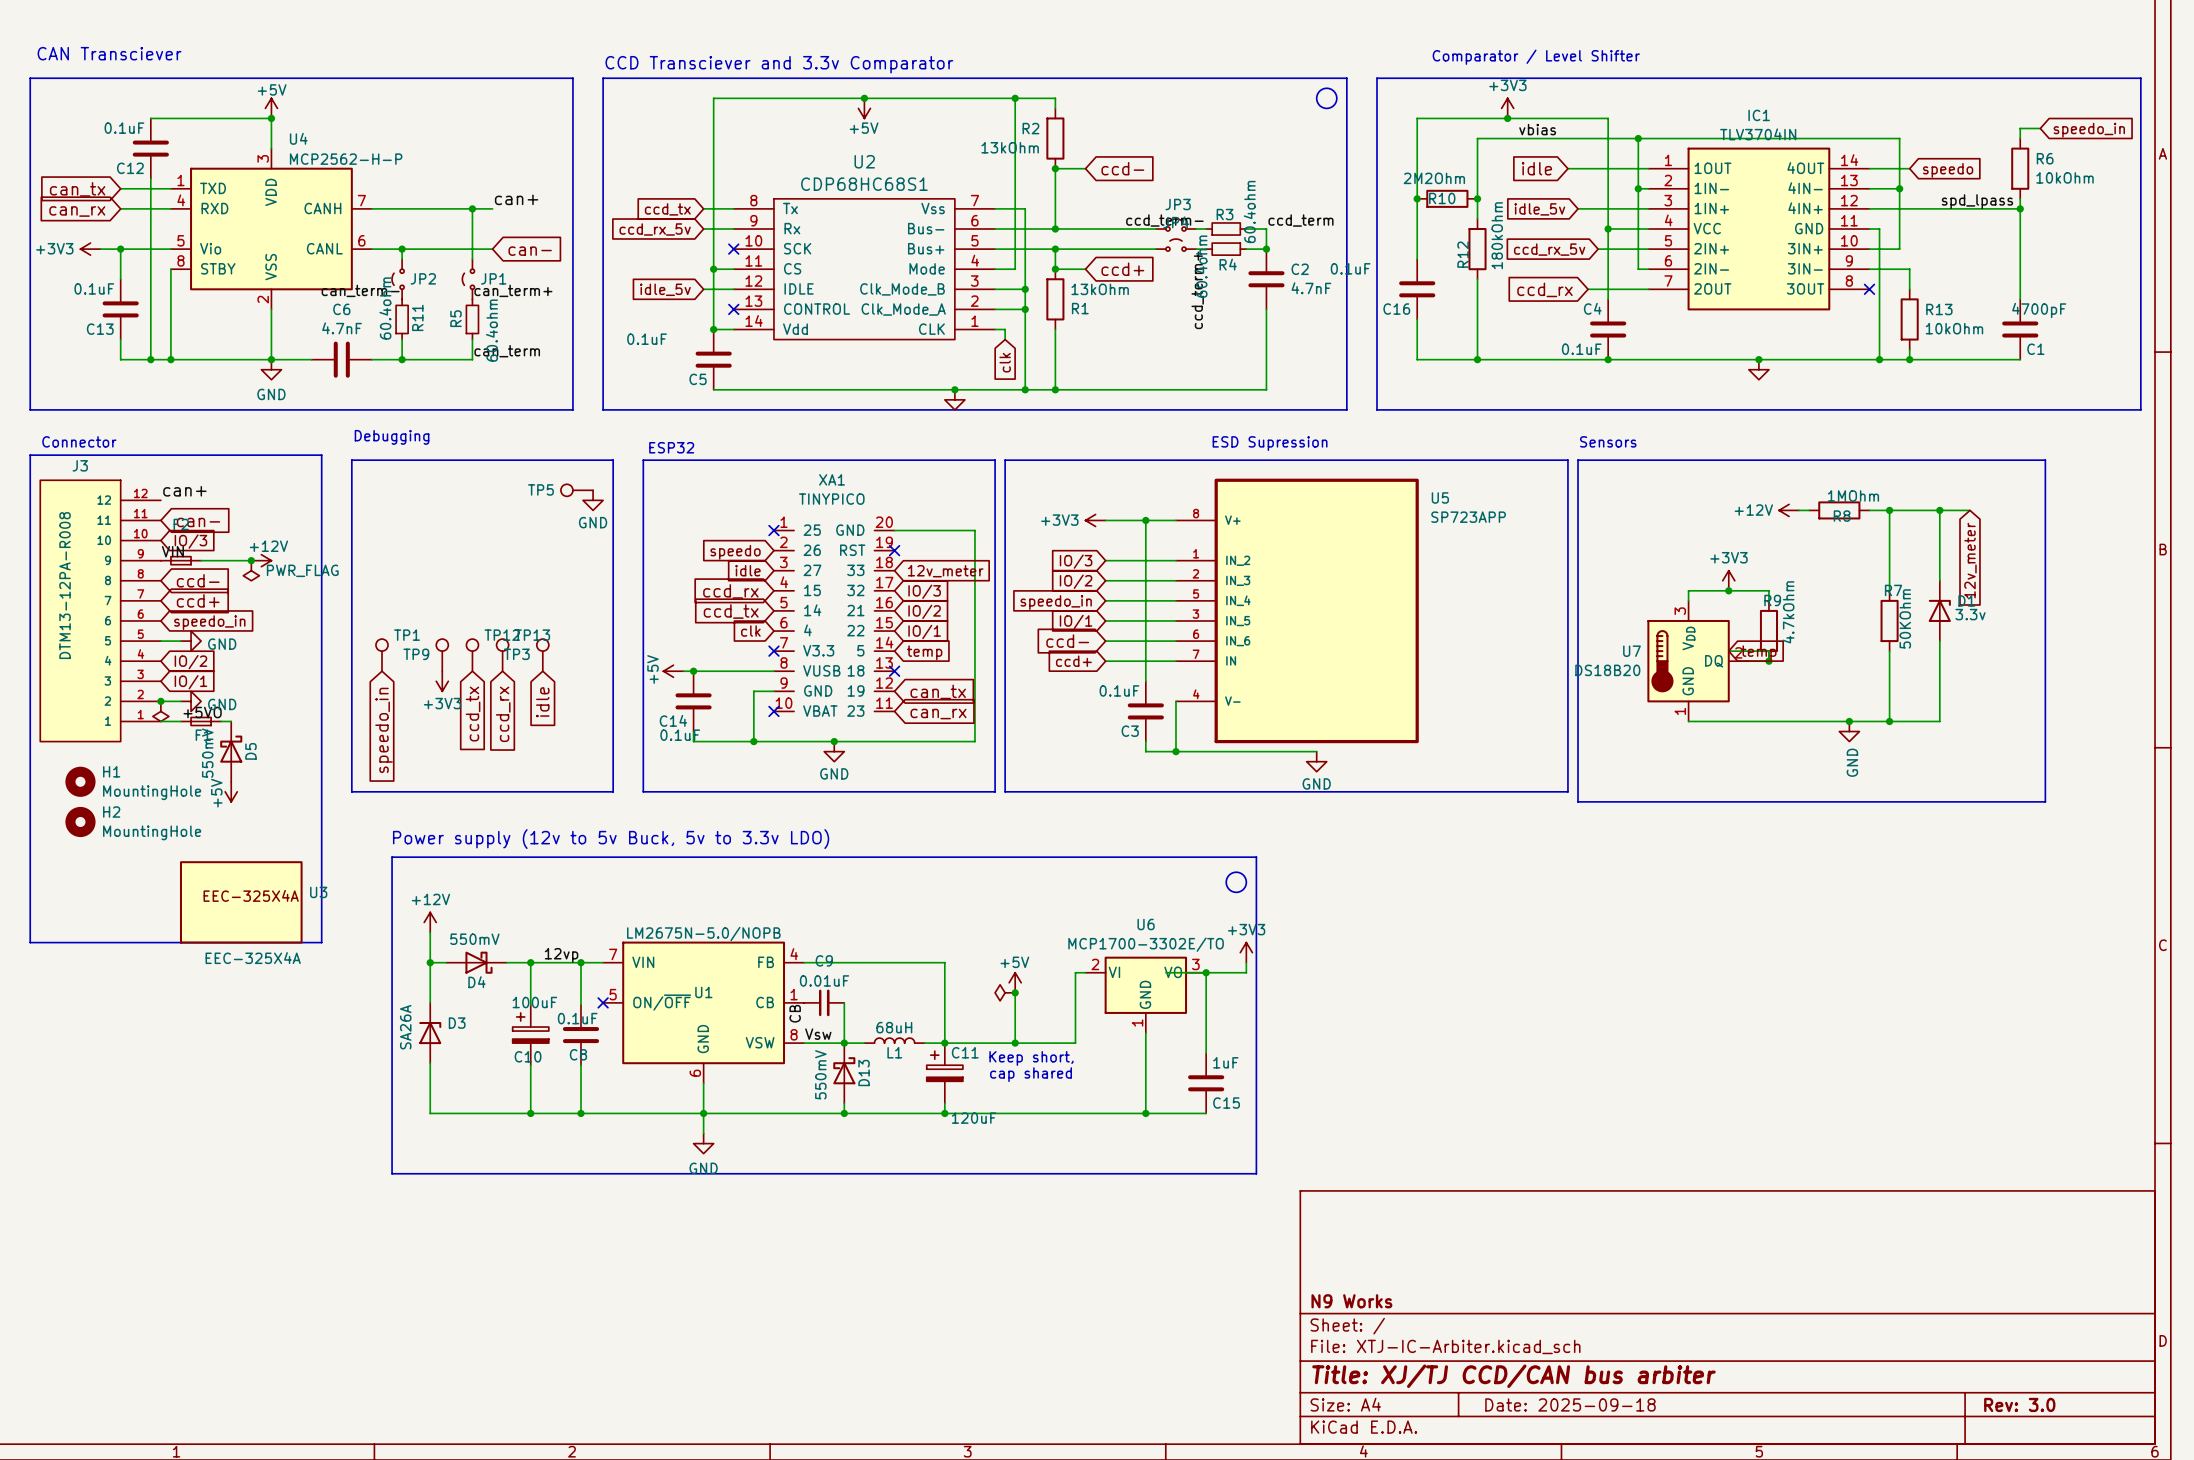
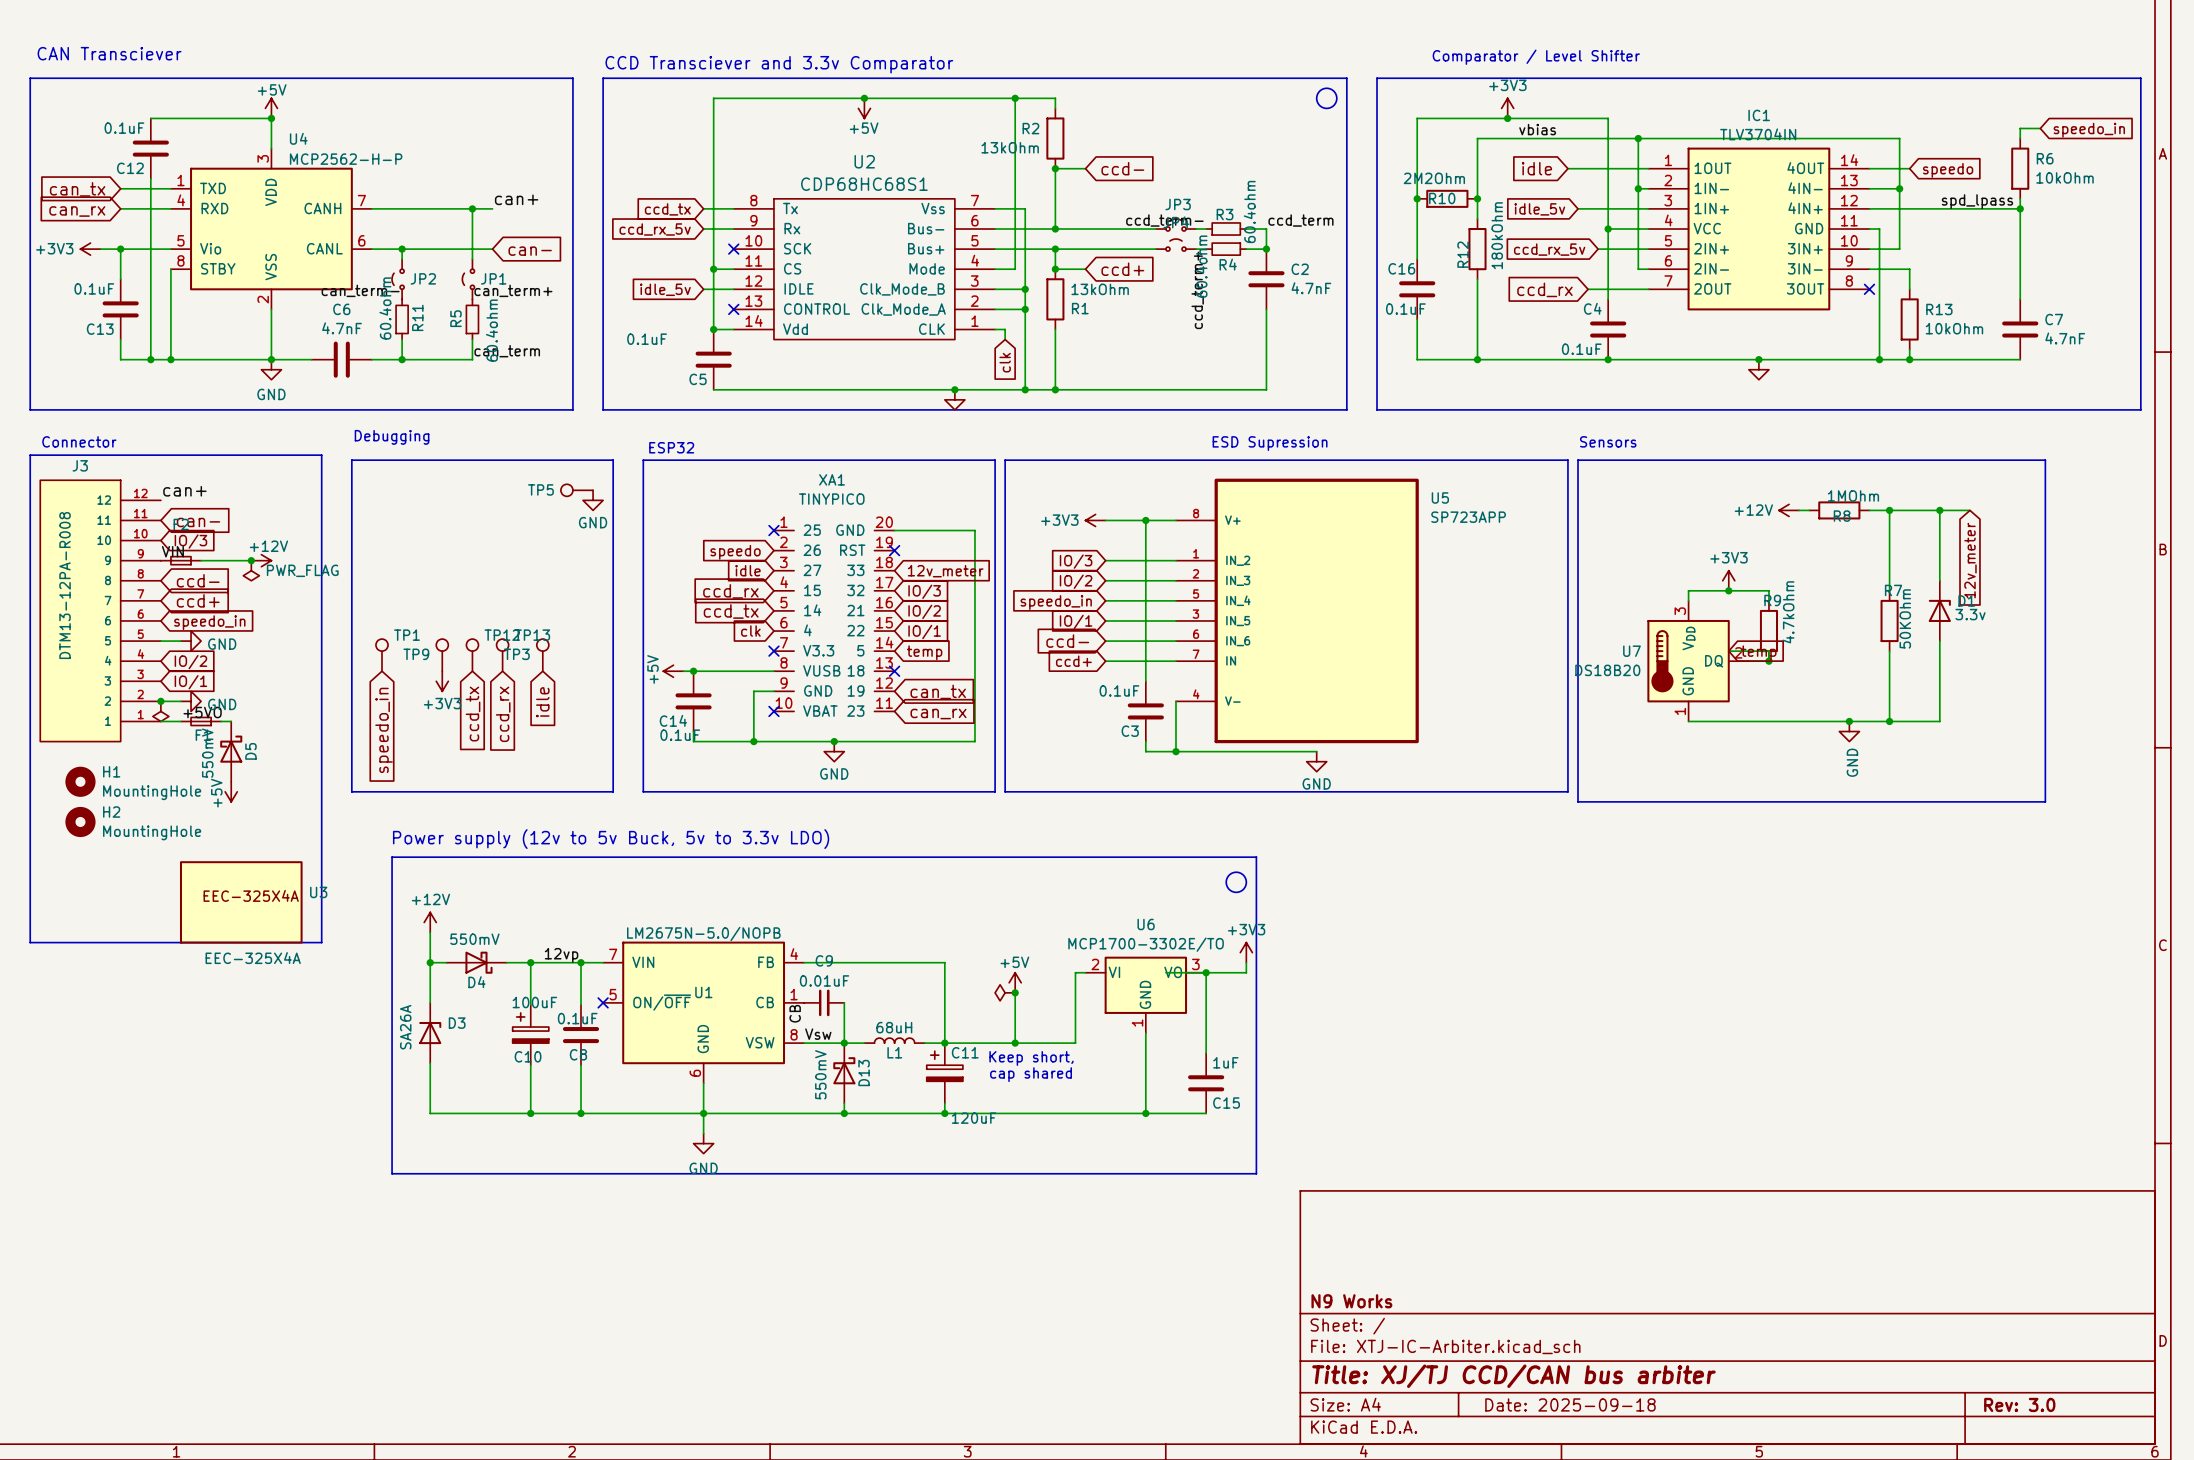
C16 value position: 0.1uF (1350, 268) -> 0.1uF (1405, 309)
C16 name position: C16 (1396, 309) -> C16 (1401, 268)
C1 value: 4700pF (2039, 310) -> 4.7nF (2065, 338)
C1 name: C1 (2035, 349) -> C7 (2054, 319)

